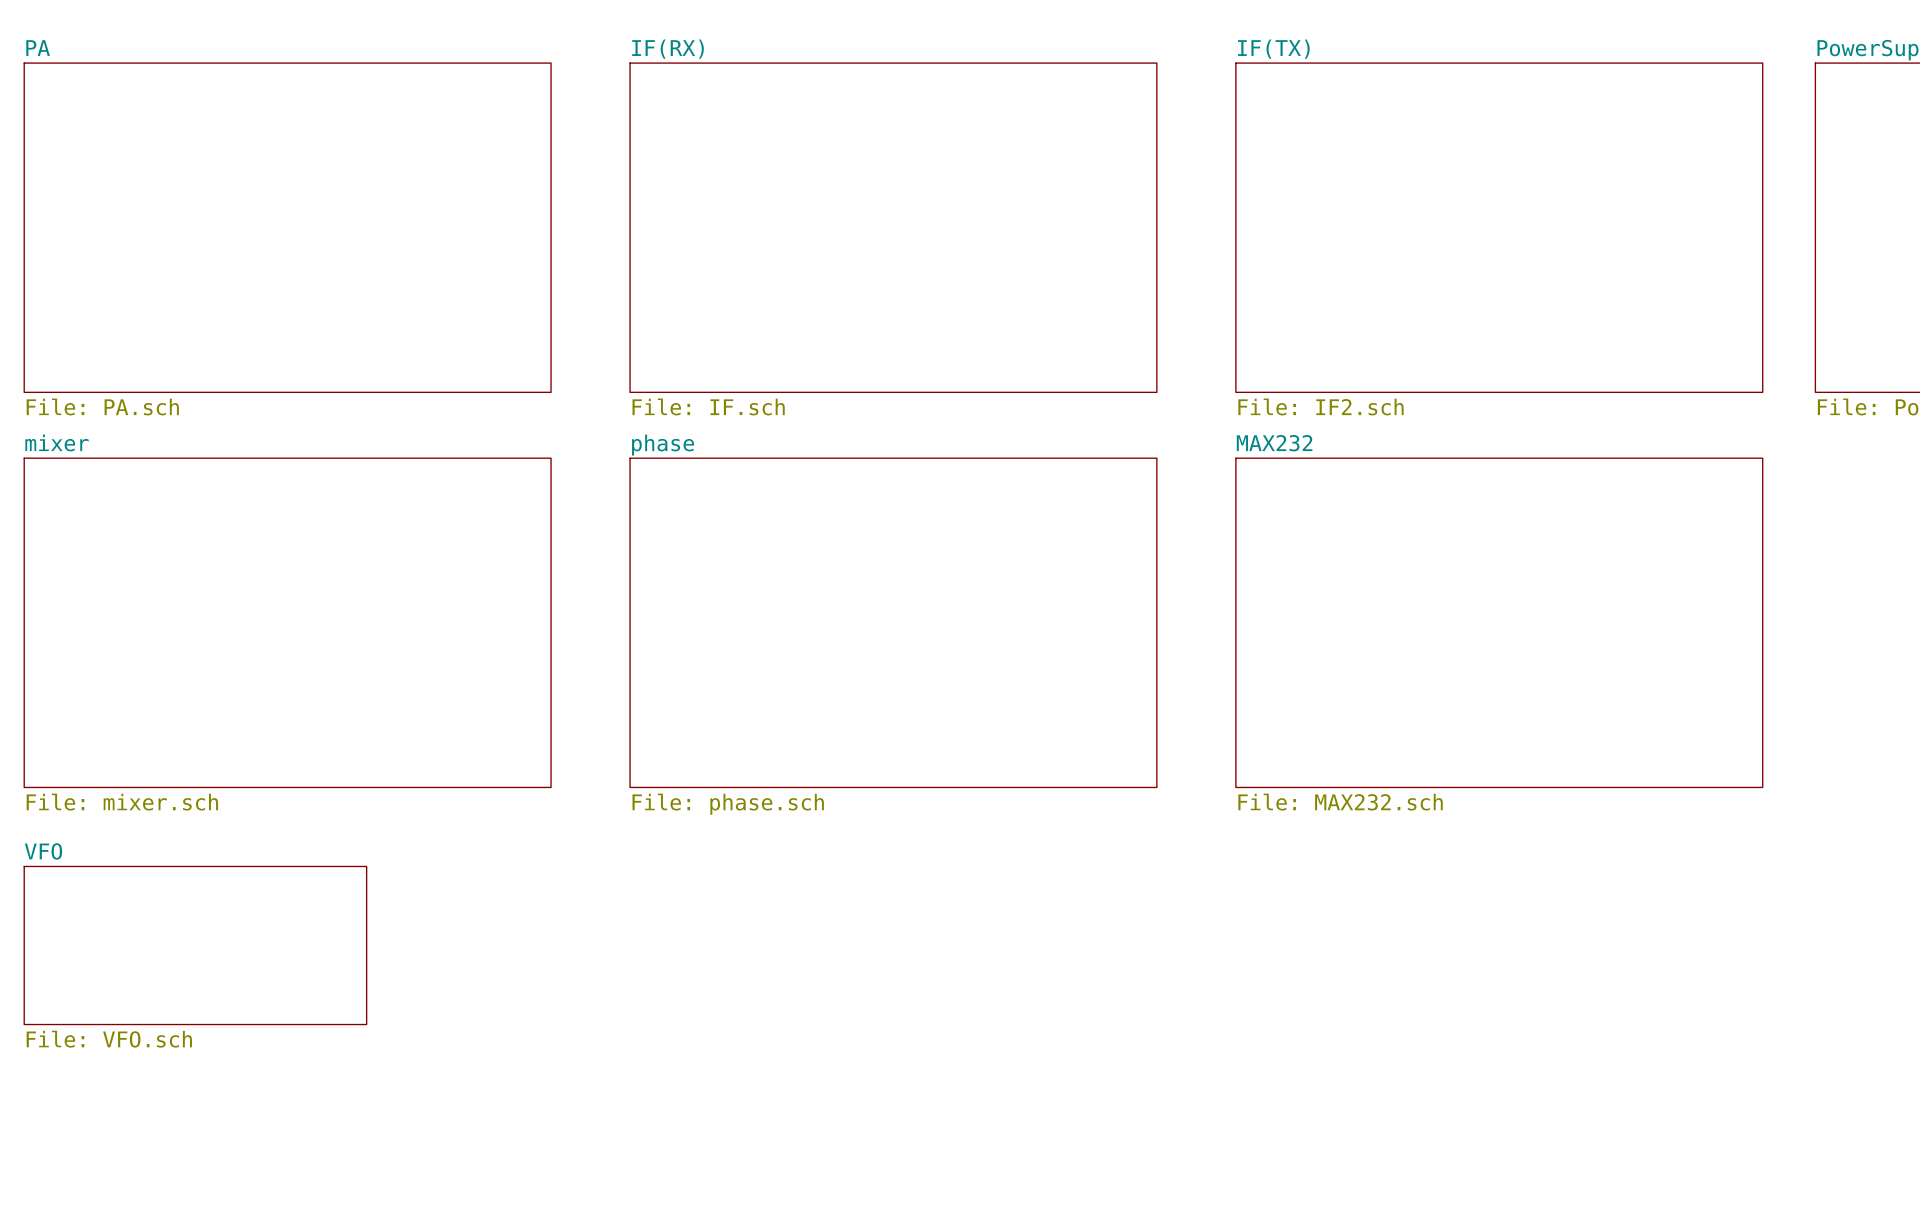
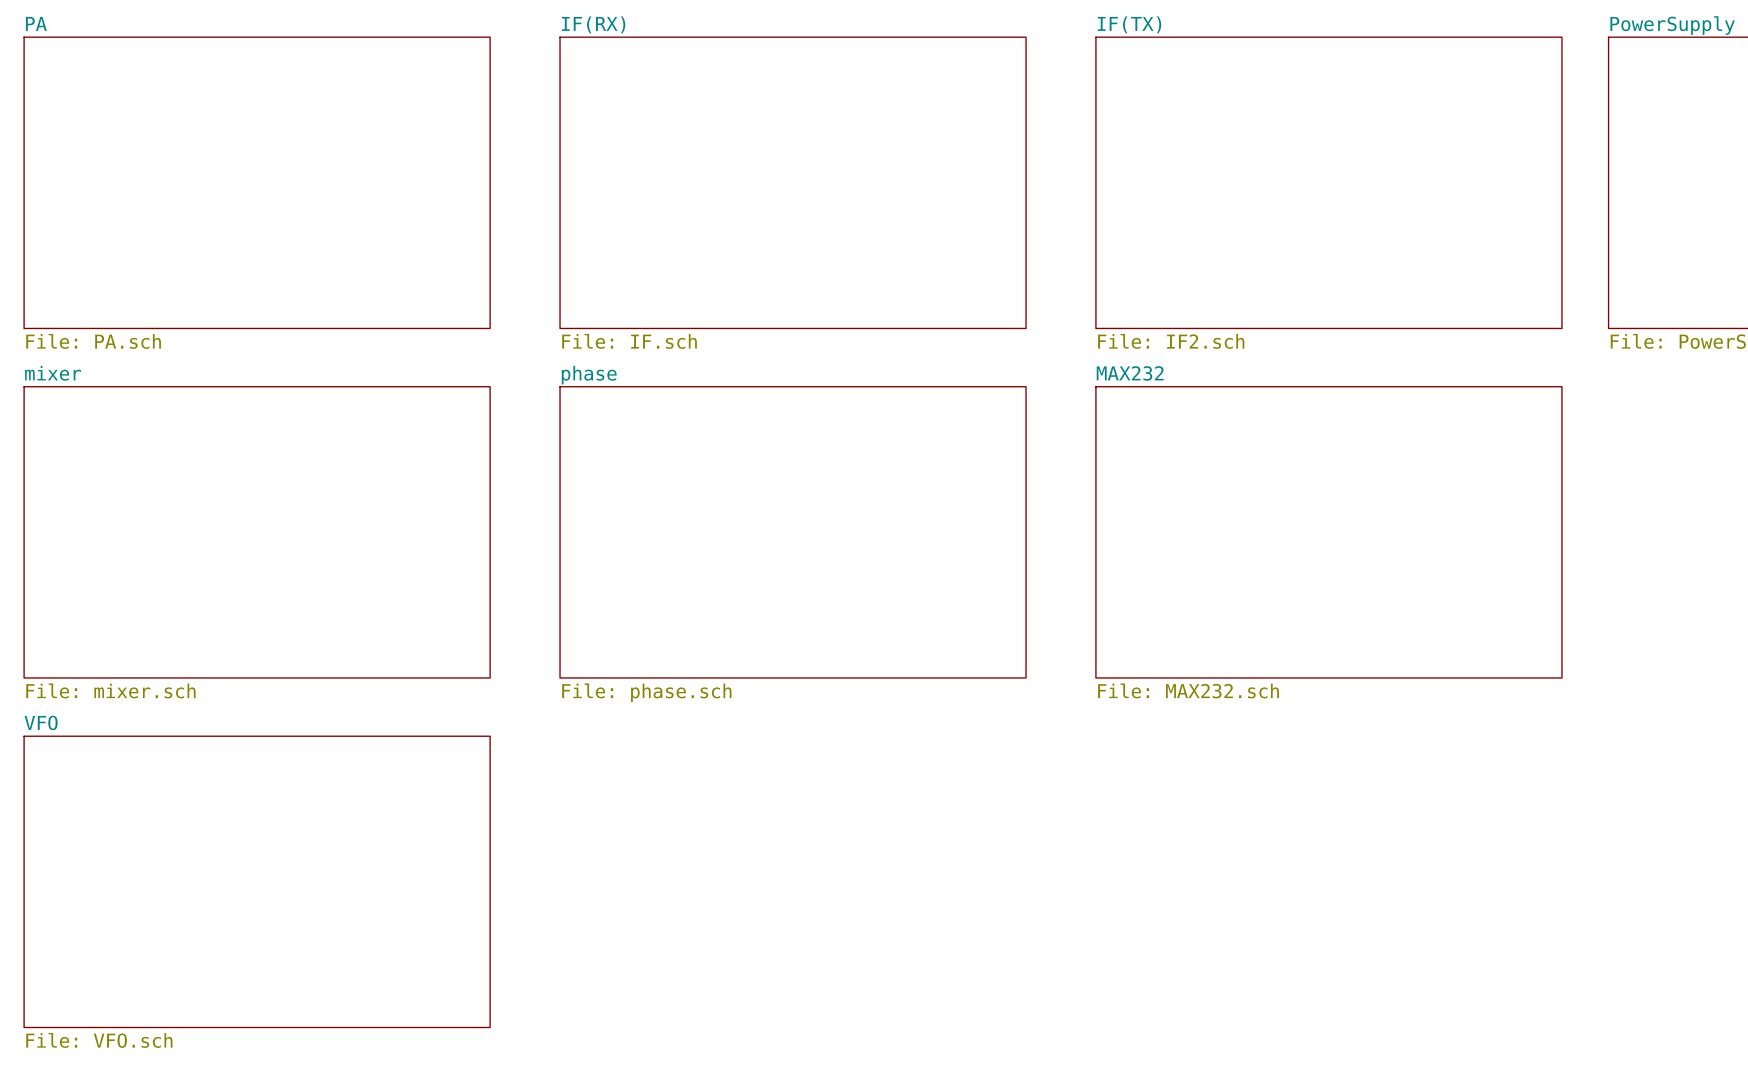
sheet VFO: File: VFO.sch (195, 945) -> none
sheet VFO: none -> File: VFO.sch (257, 881)

